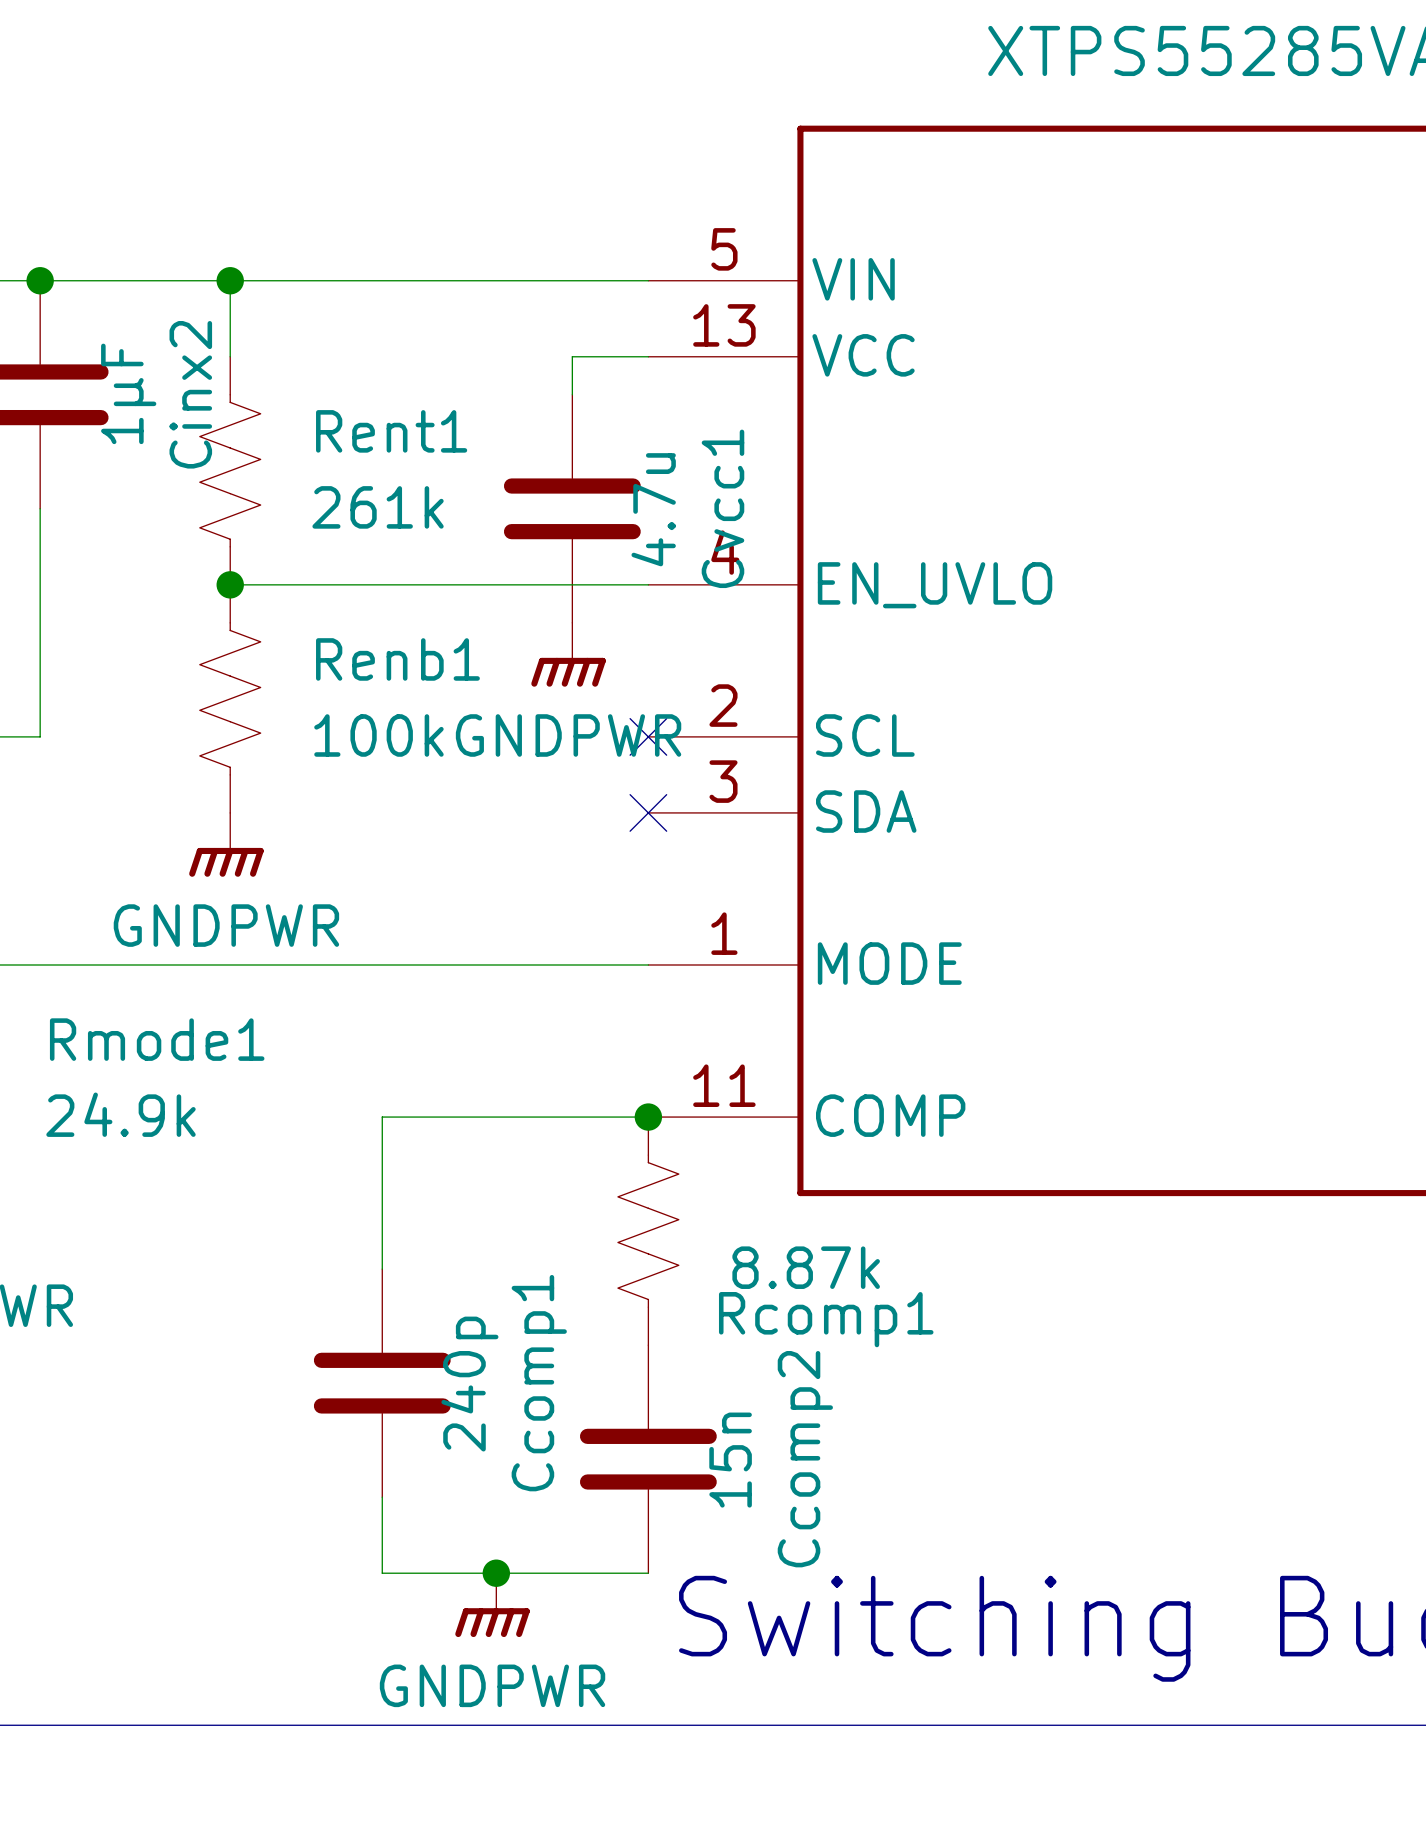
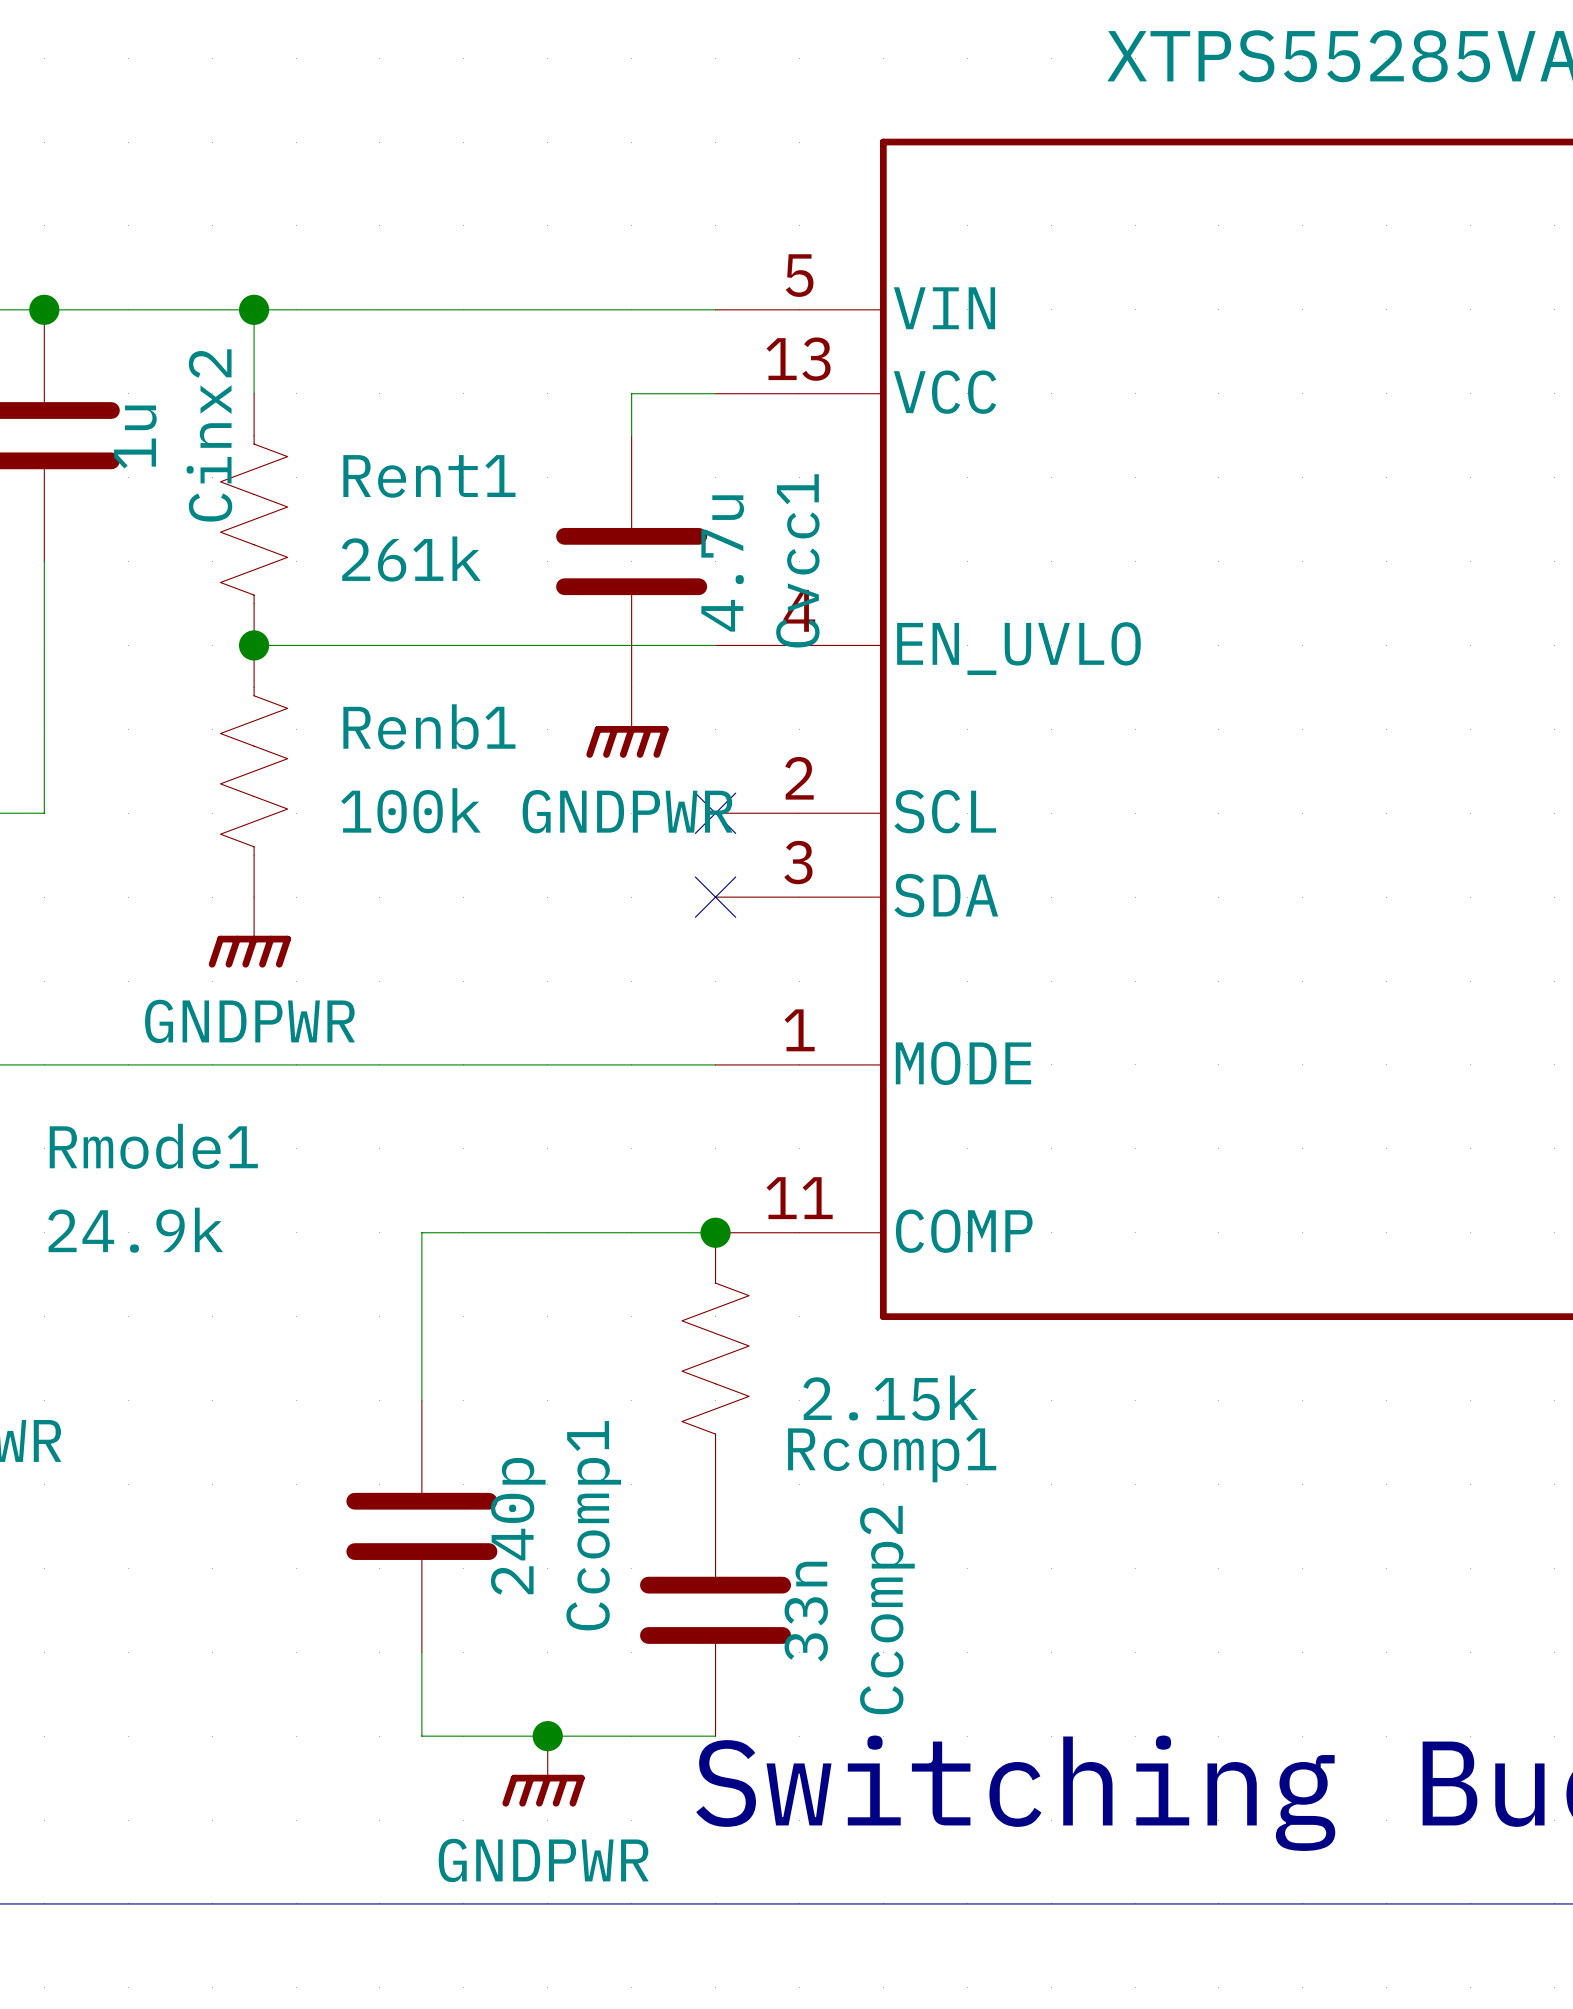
Cinx2 value: 1µF (128, 393) -> 1u (135, 437)
Rcomp1 value: 8.87k (806, 1267) -> 2.15k (890, 1398)
Ccomp2 value: 15n (730, 1460) -> 33n (806, 1611)

